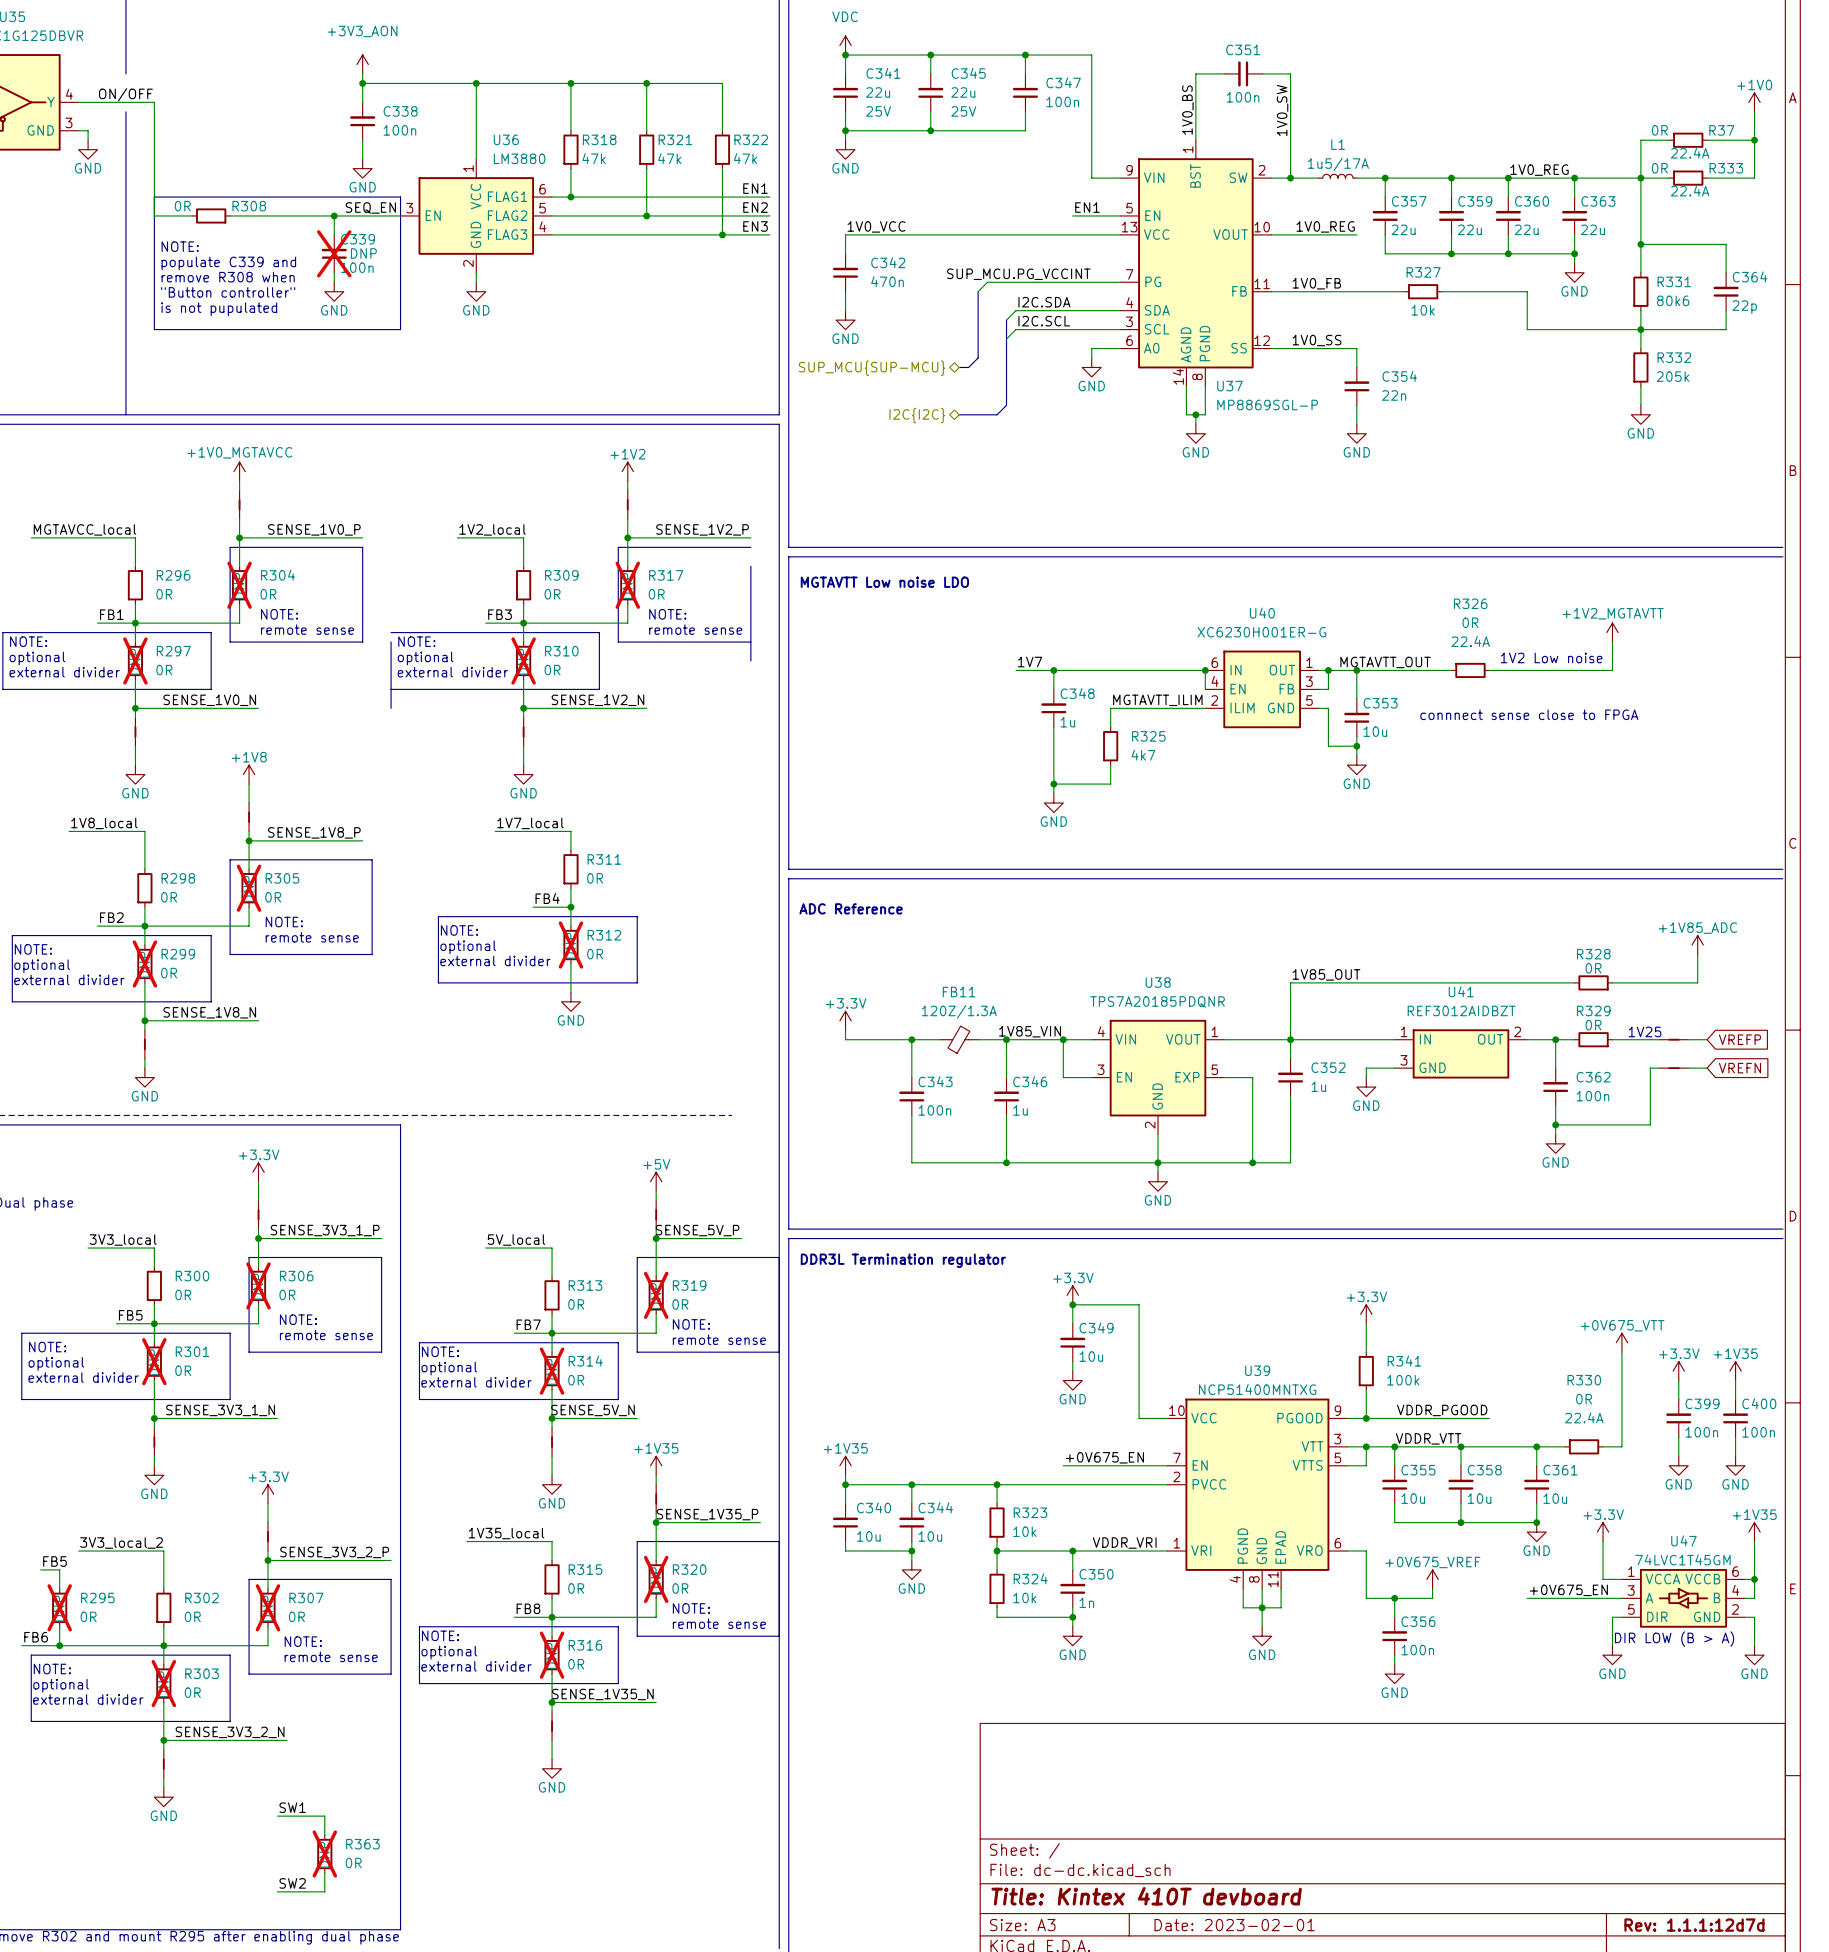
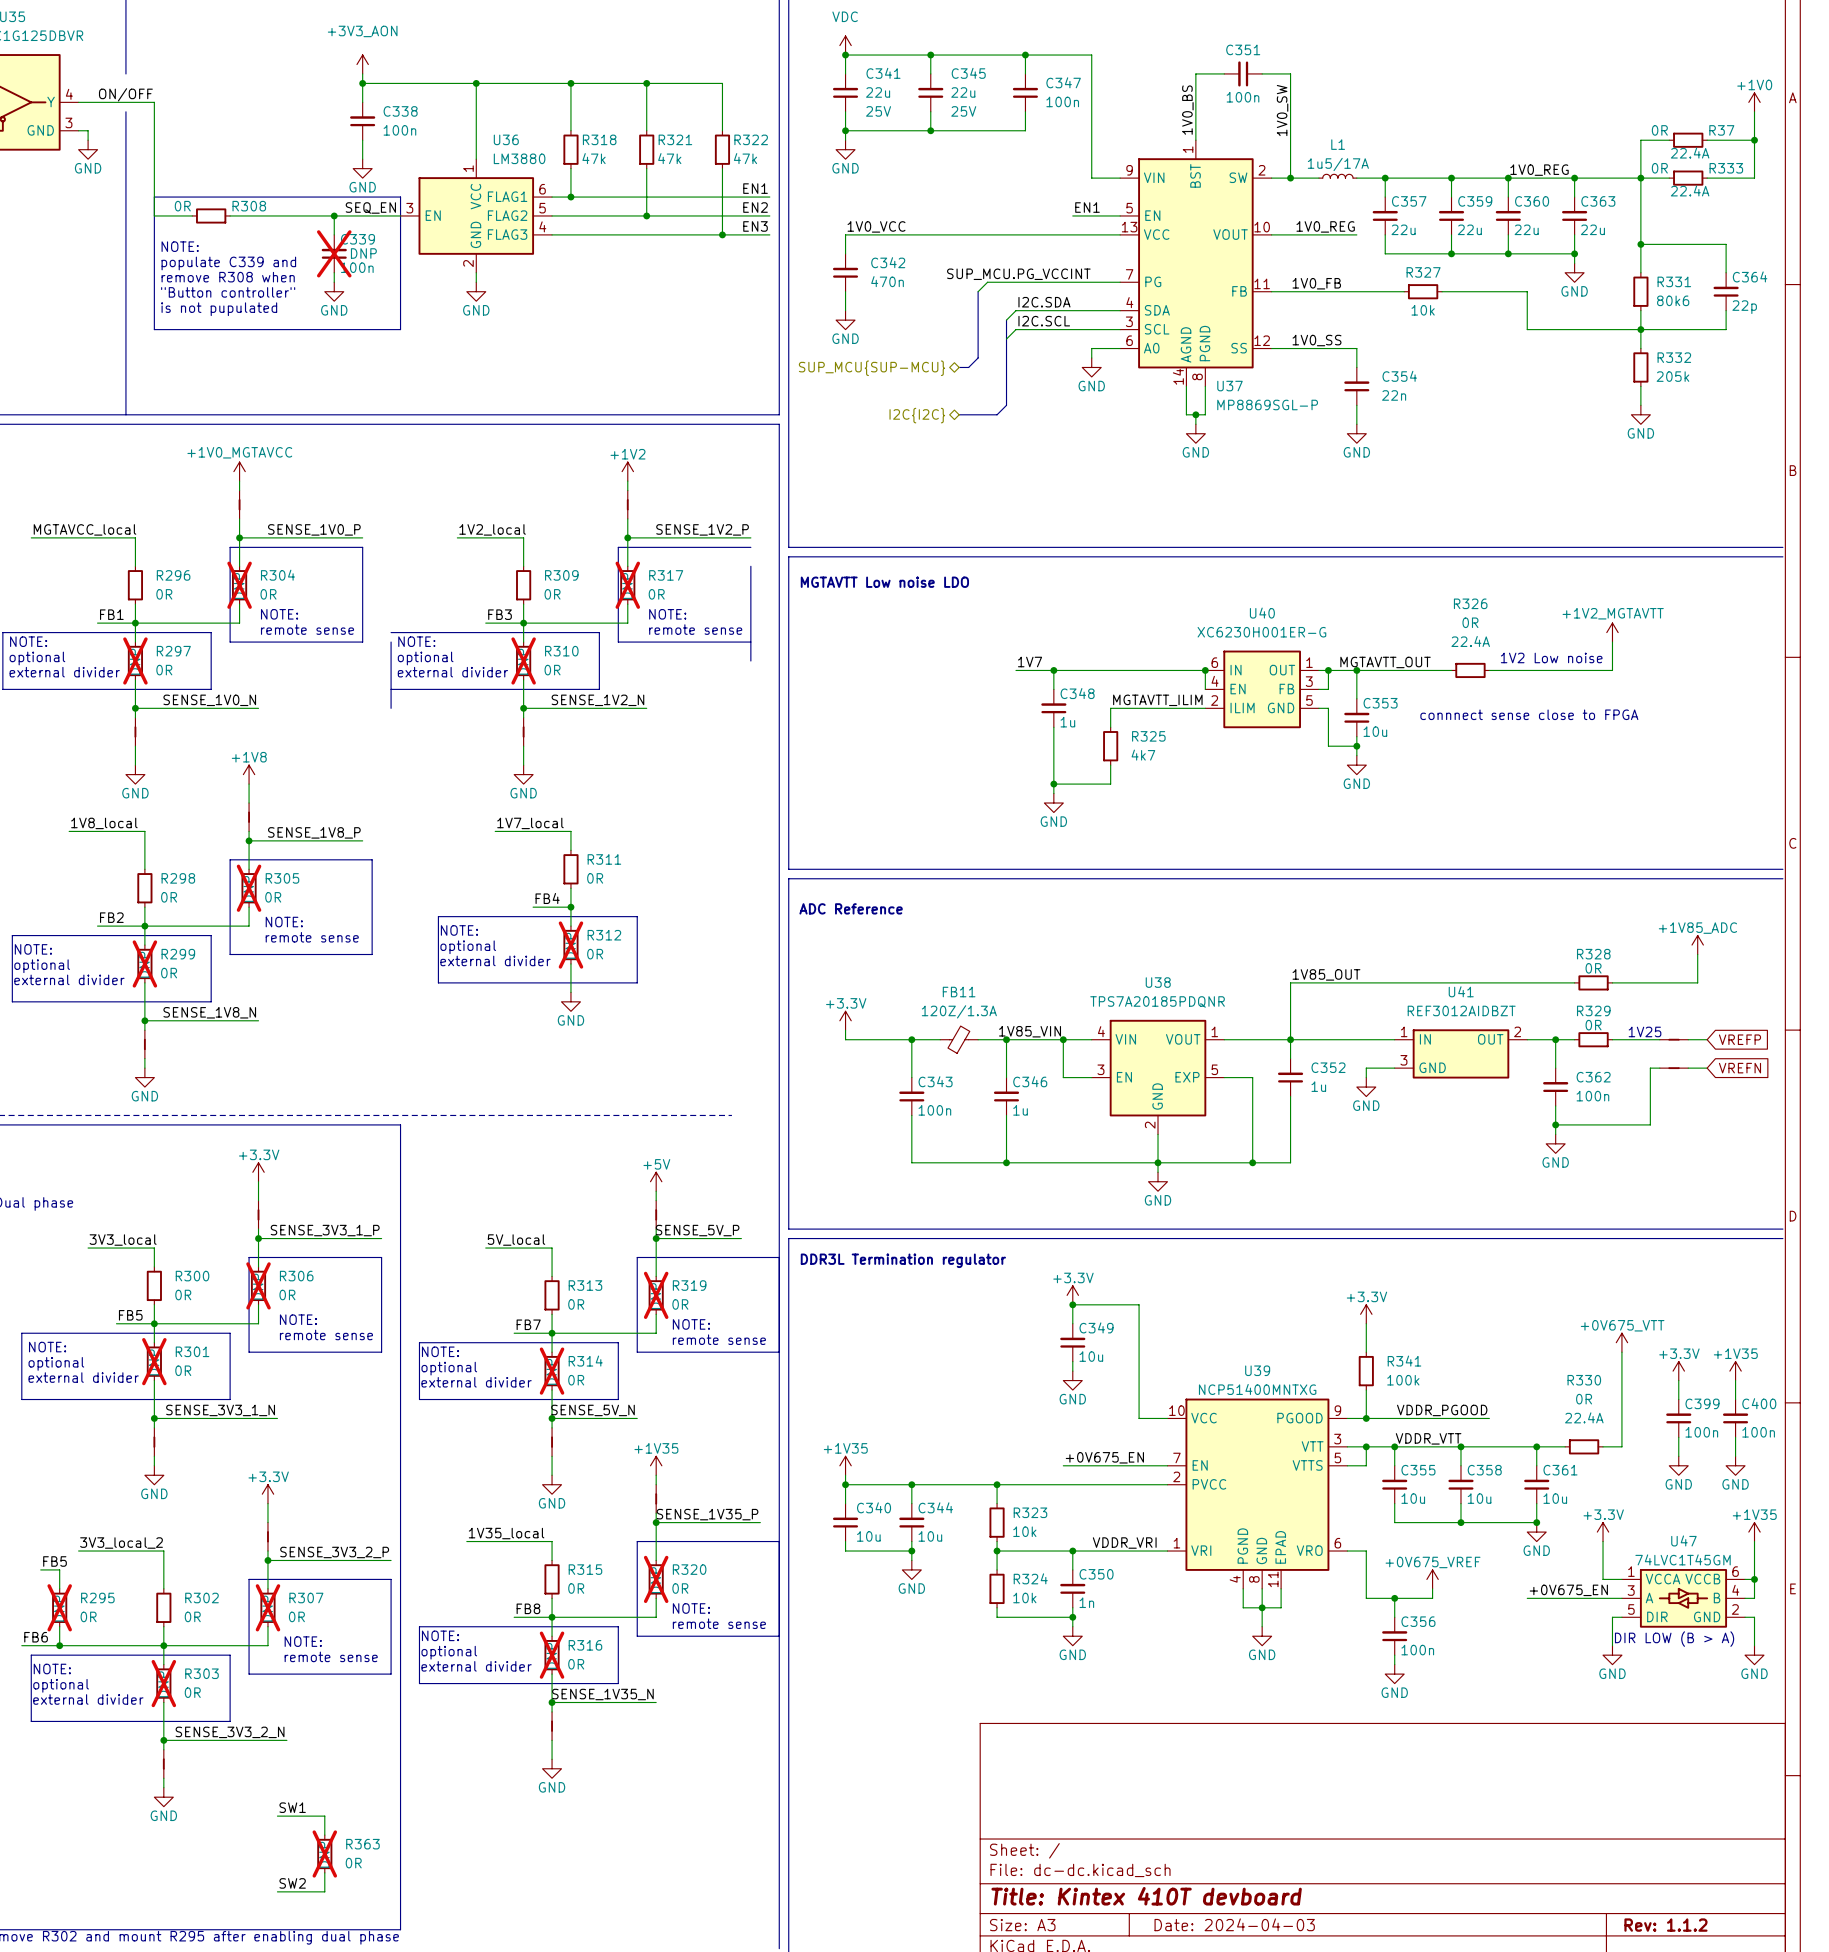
title block: Date: 2023-02-01 (1234, 1925) -> Date: 2024-04-03 (1234, 1924)
title block: Rev: 1.1.1:12d7d (1694, 1925) -> Rev: 1.1.2 (1665, 1925)

